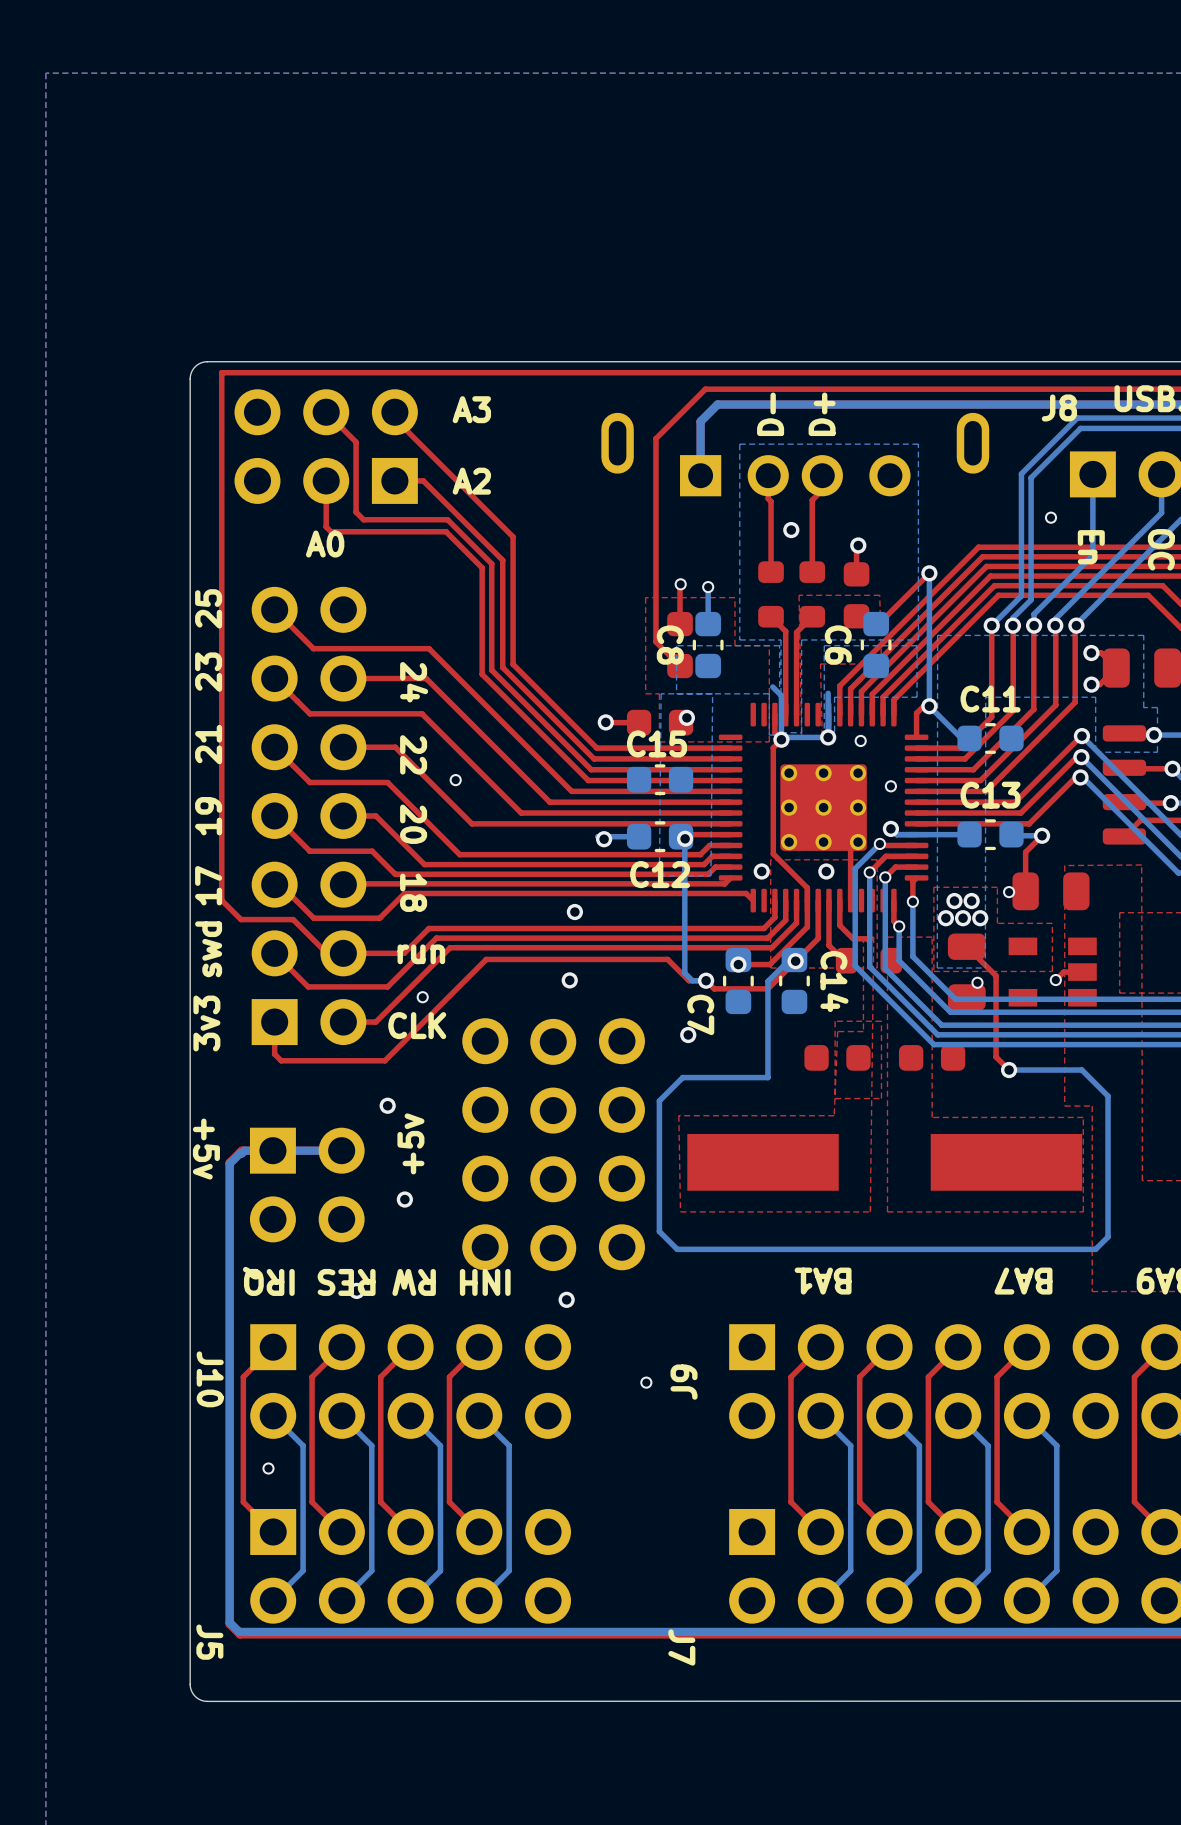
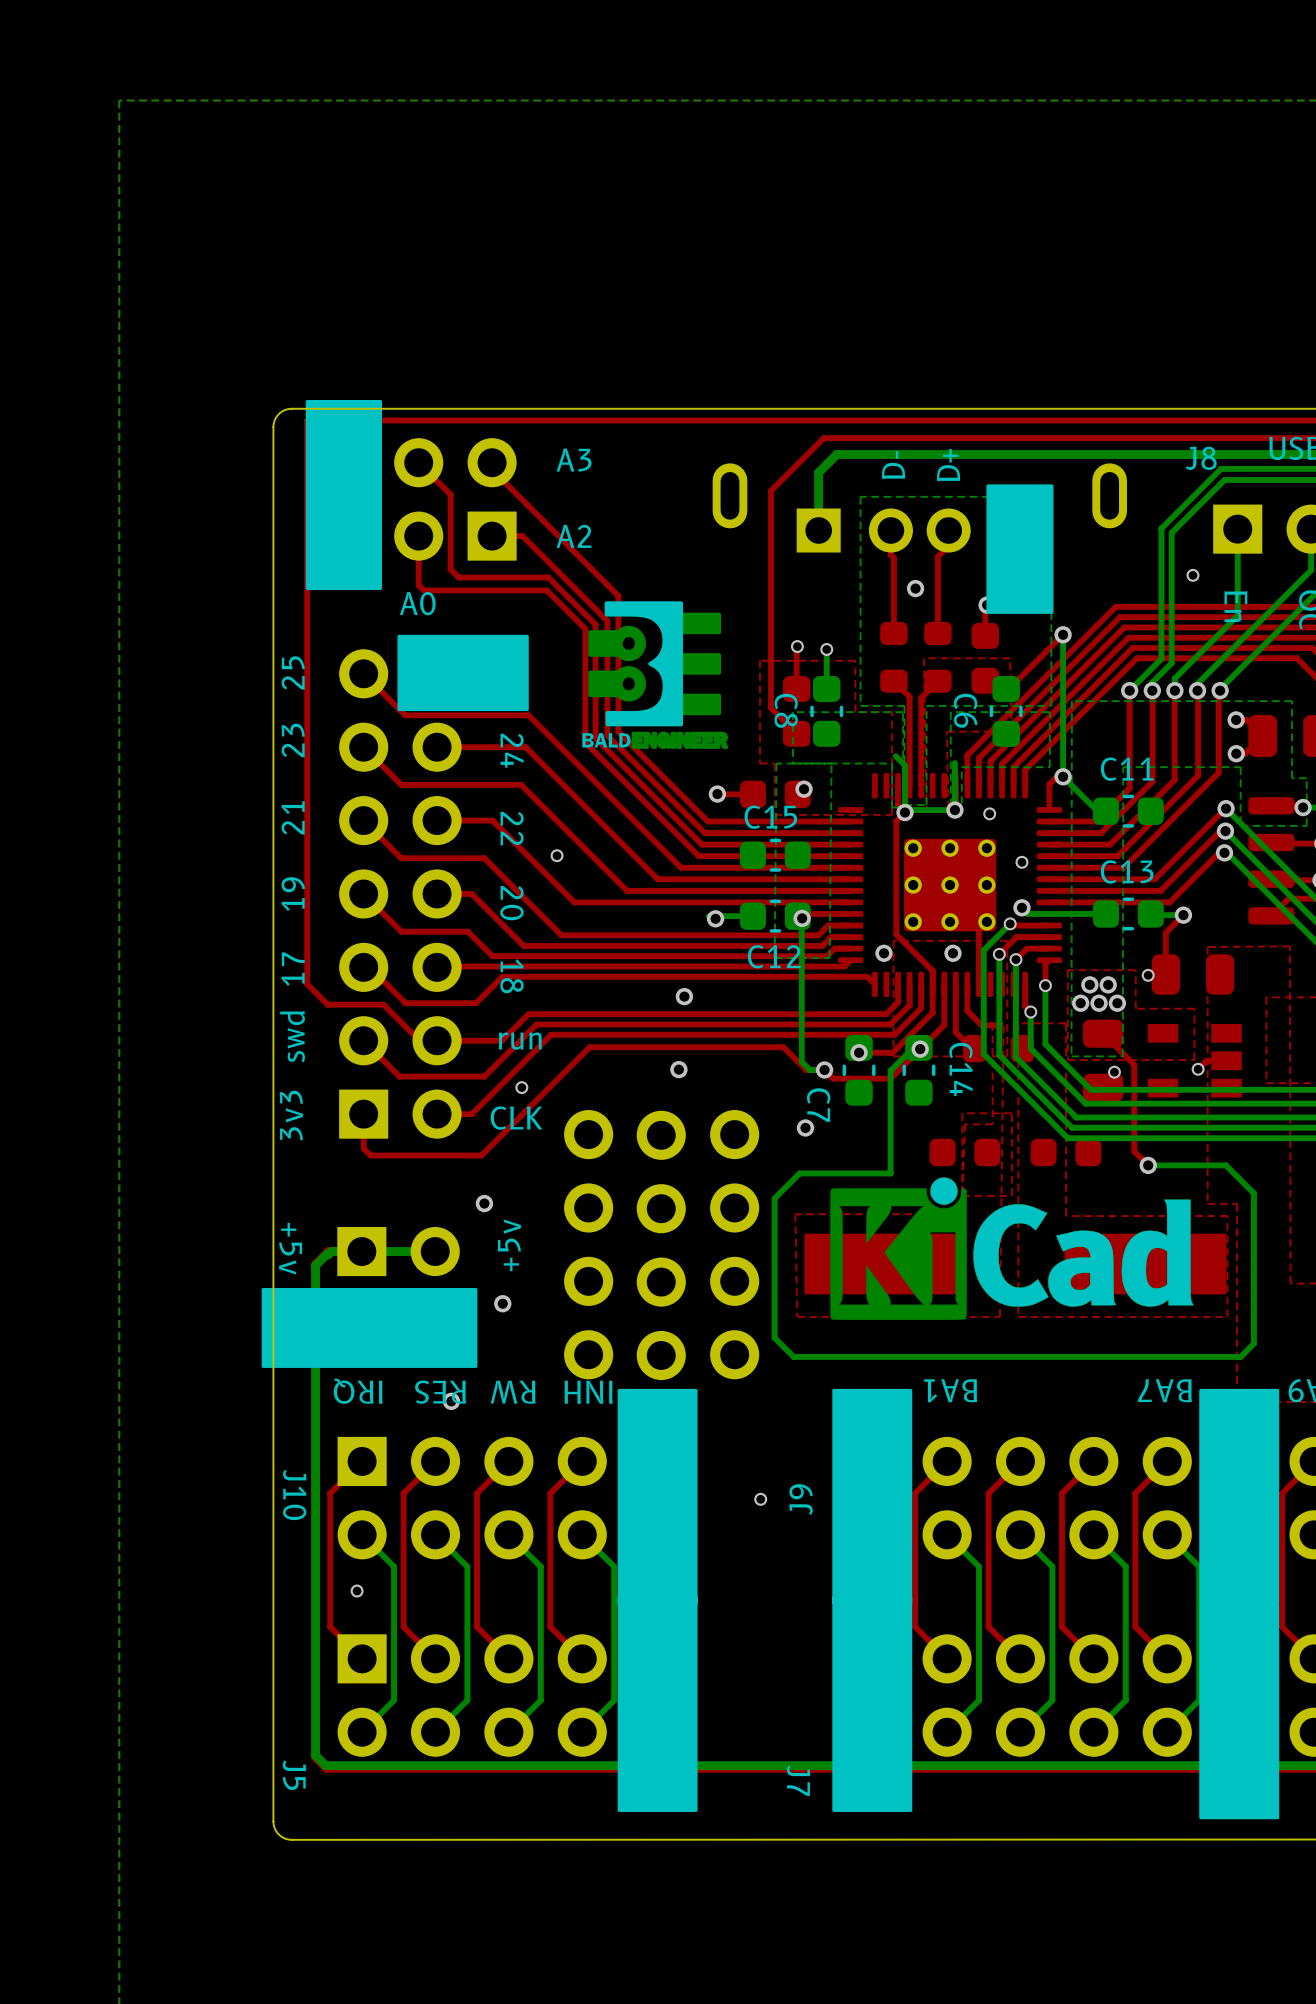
drawing: none -> [305, 399, 383, 591]
drawing: none -> [986, 484, 1054, 614]
drawing: none -> [582, 601, 729, 750]
drawing: none -> [397, 634, 529, 712]
drawing: none -> [830, 1177, 1194, 1320]
drawing: none -> [261, 1287, 478, 1368]
drawing: none -> [617, 1388, 698, 1812]
drawing: none -> [832, 1388, 913, 1812]
drawing: none -> [1199, 1388, 1280, 1820]

